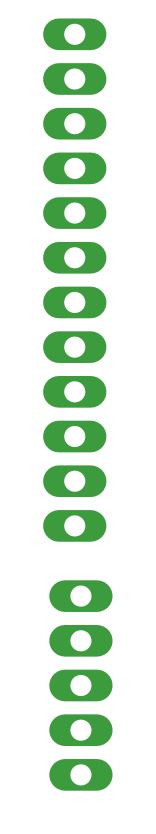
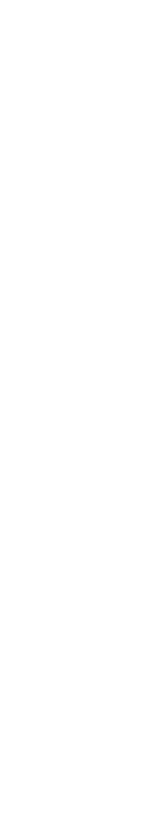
part: (74, 280) -> none
part: (80, 685) -> none

